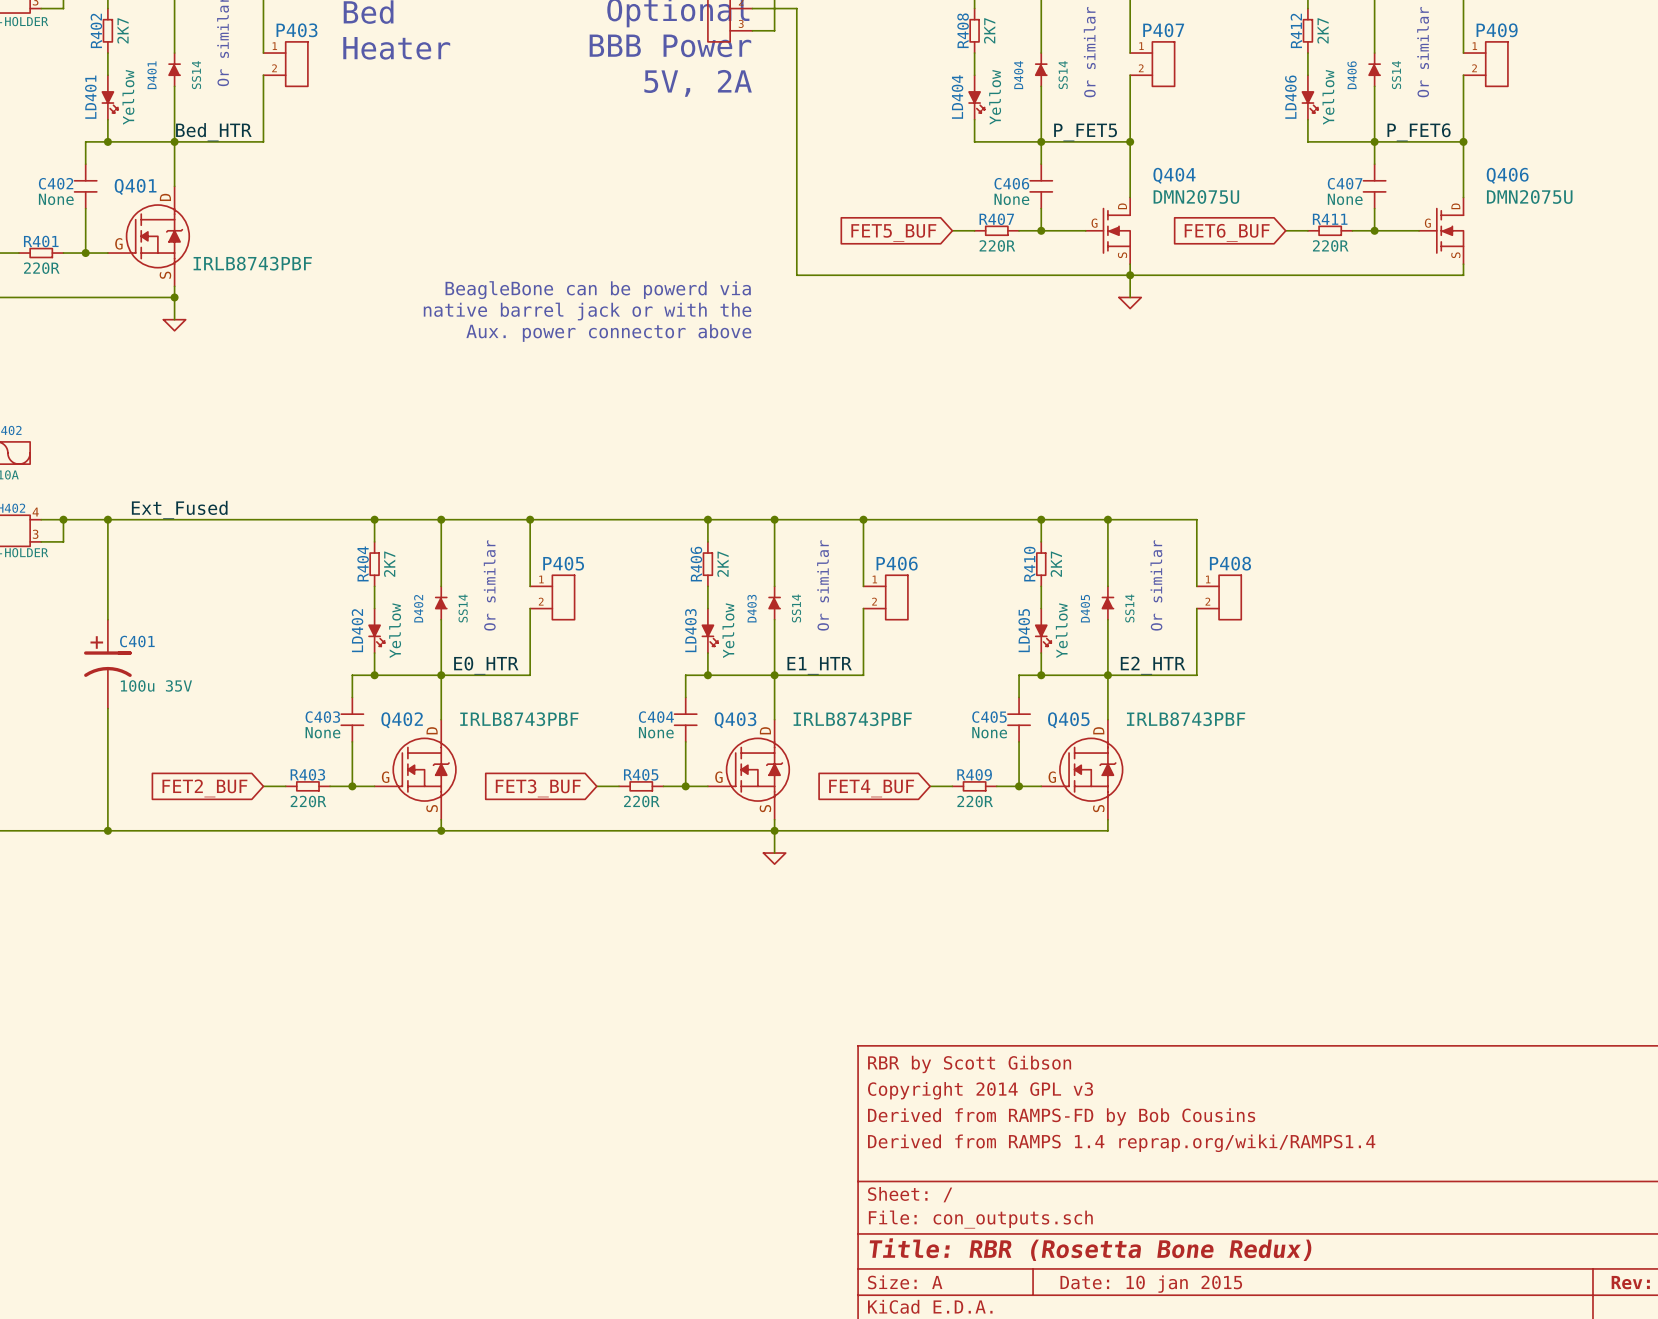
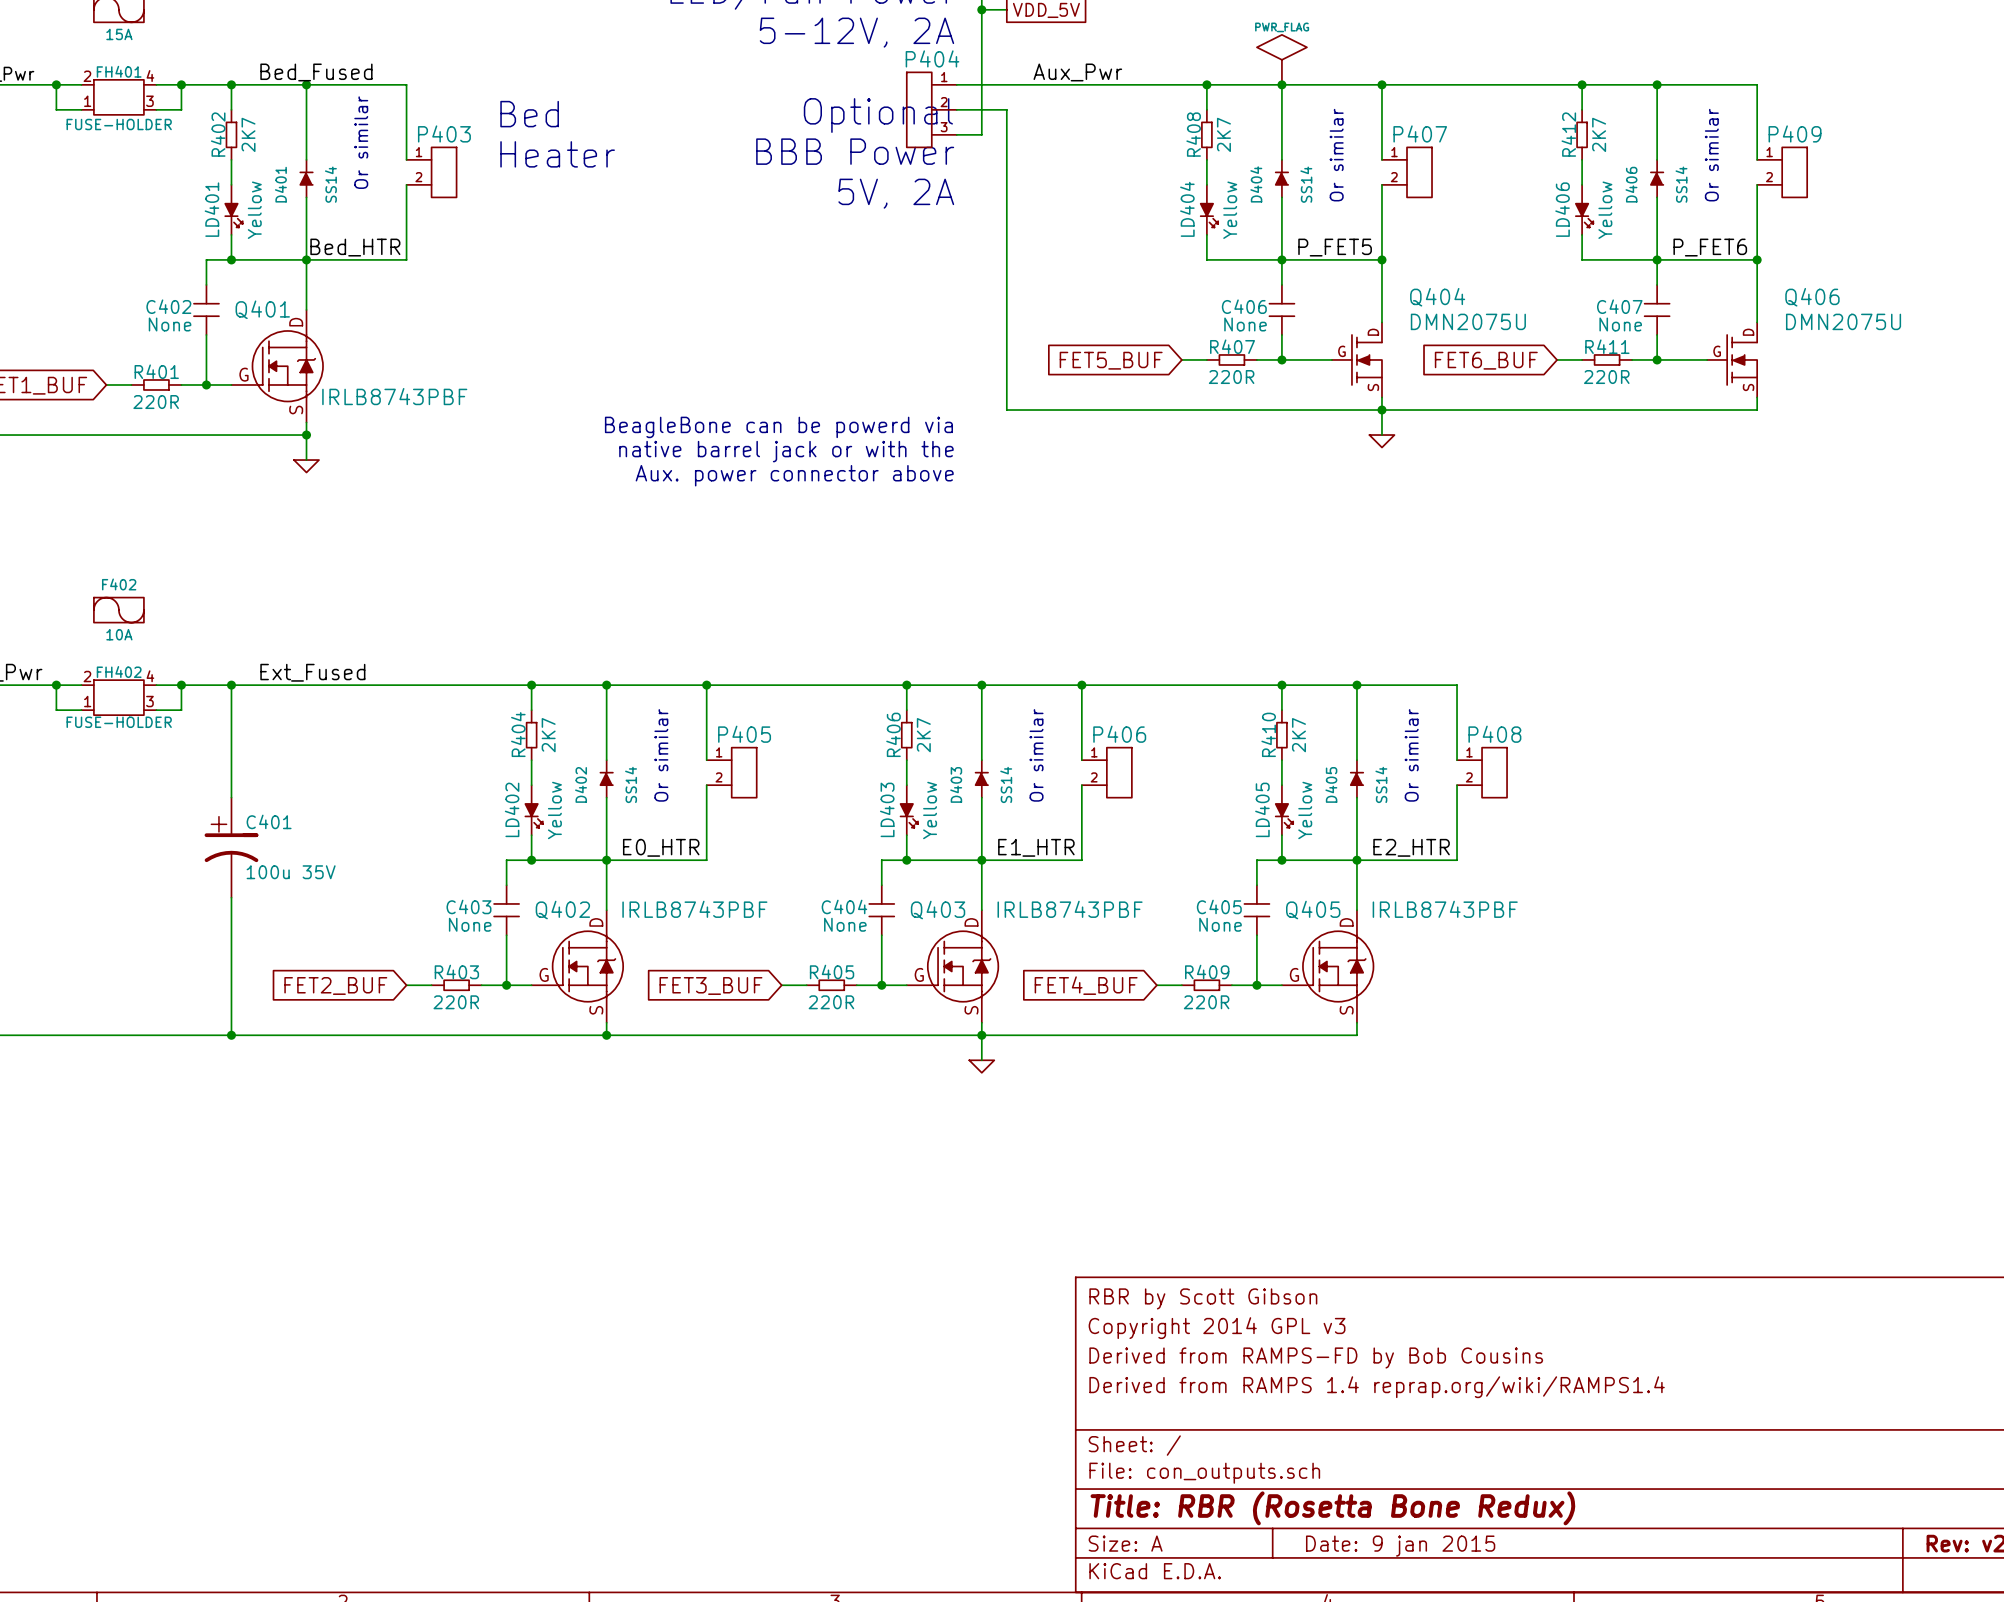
title block: Date: 10 jan 2015 (1151, 1284) -> Date: 9 jan 2015 (1400, 1546)

